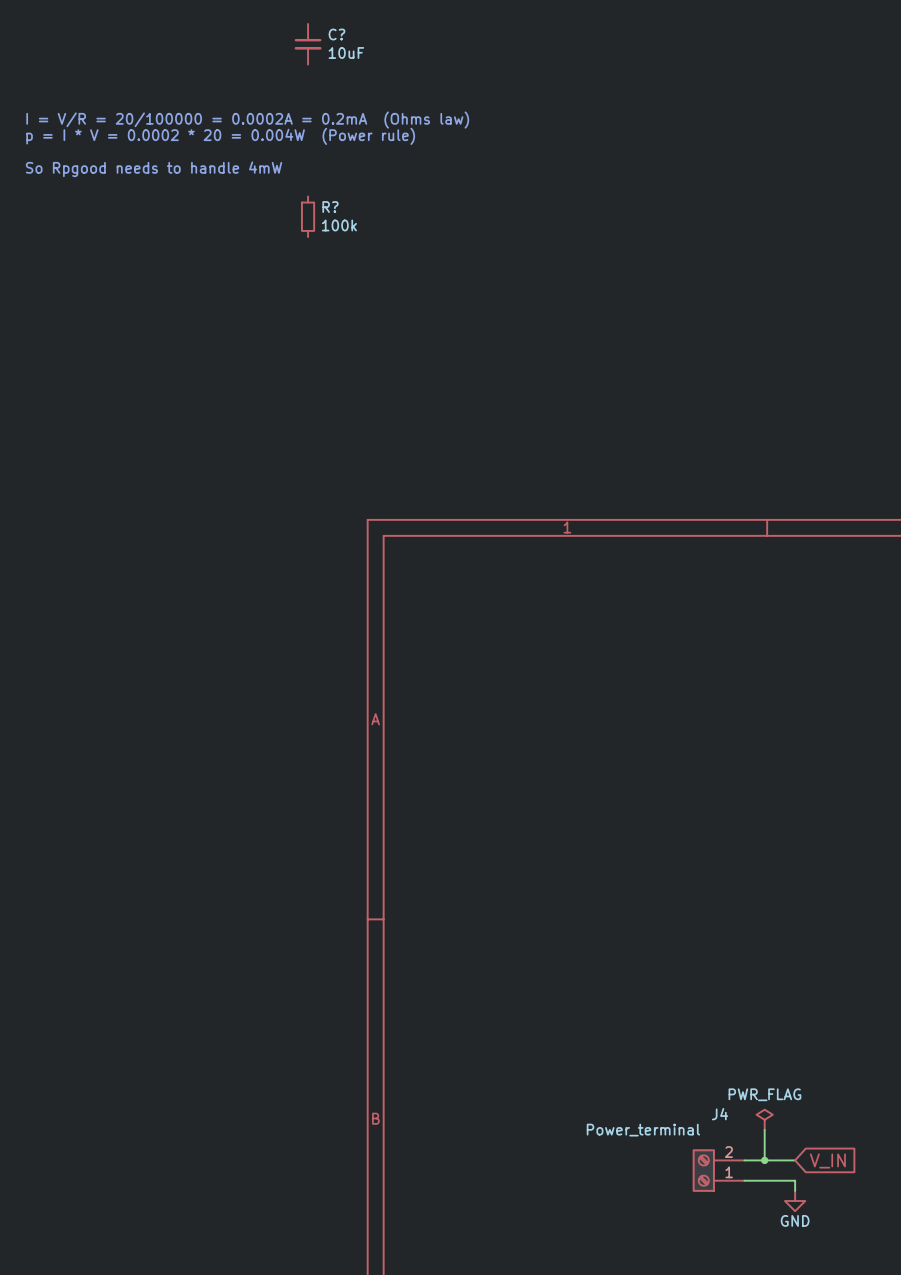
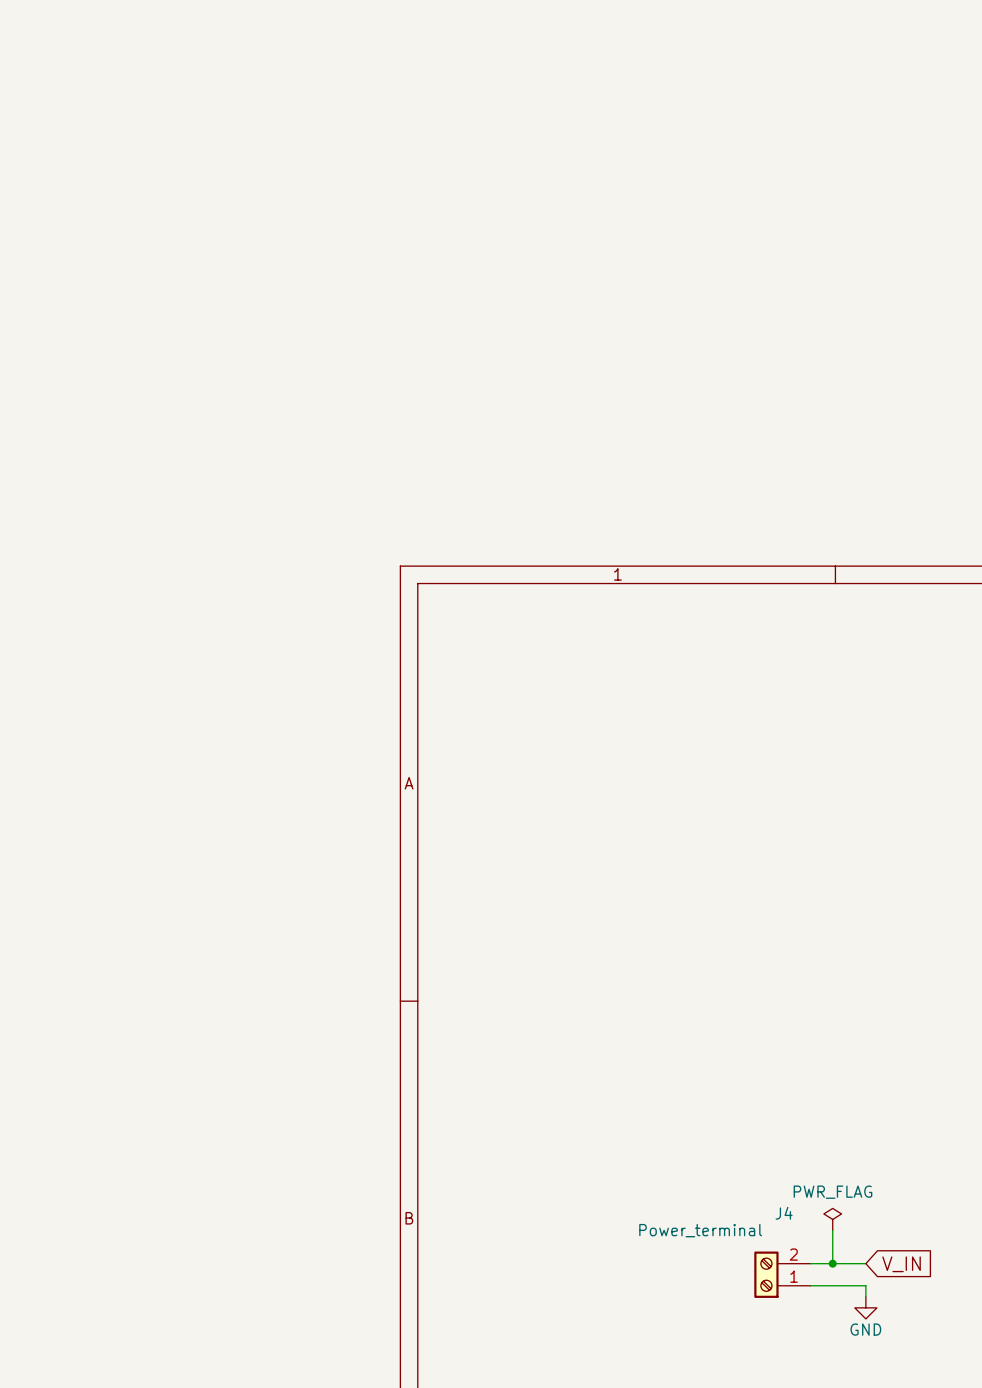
C?: 10uF (308, 44) -> none
text: I = V/R = 20/100000 = 0.0002A = 0.2mA (Ohms law) (247, 120) -> none
text: p = I * V = 0.0002 * 20 = 0.004W (Power rule) (220, 136) -> none
text: So Rpgood needs to handle 4mW (154, 169) -> none
R?: 100k (308, 216) -> none

